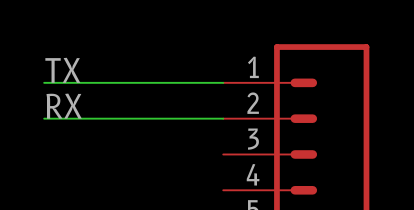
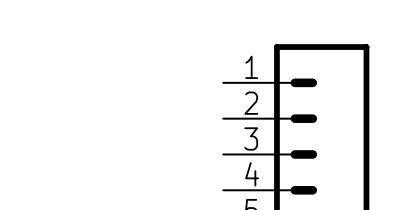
label: TX (62, 70) -> none
wire: (44, 82) (223, 82) -> none
label: RX (64, 106) -> none
wire: (44, 118) (223, 118) -> none

